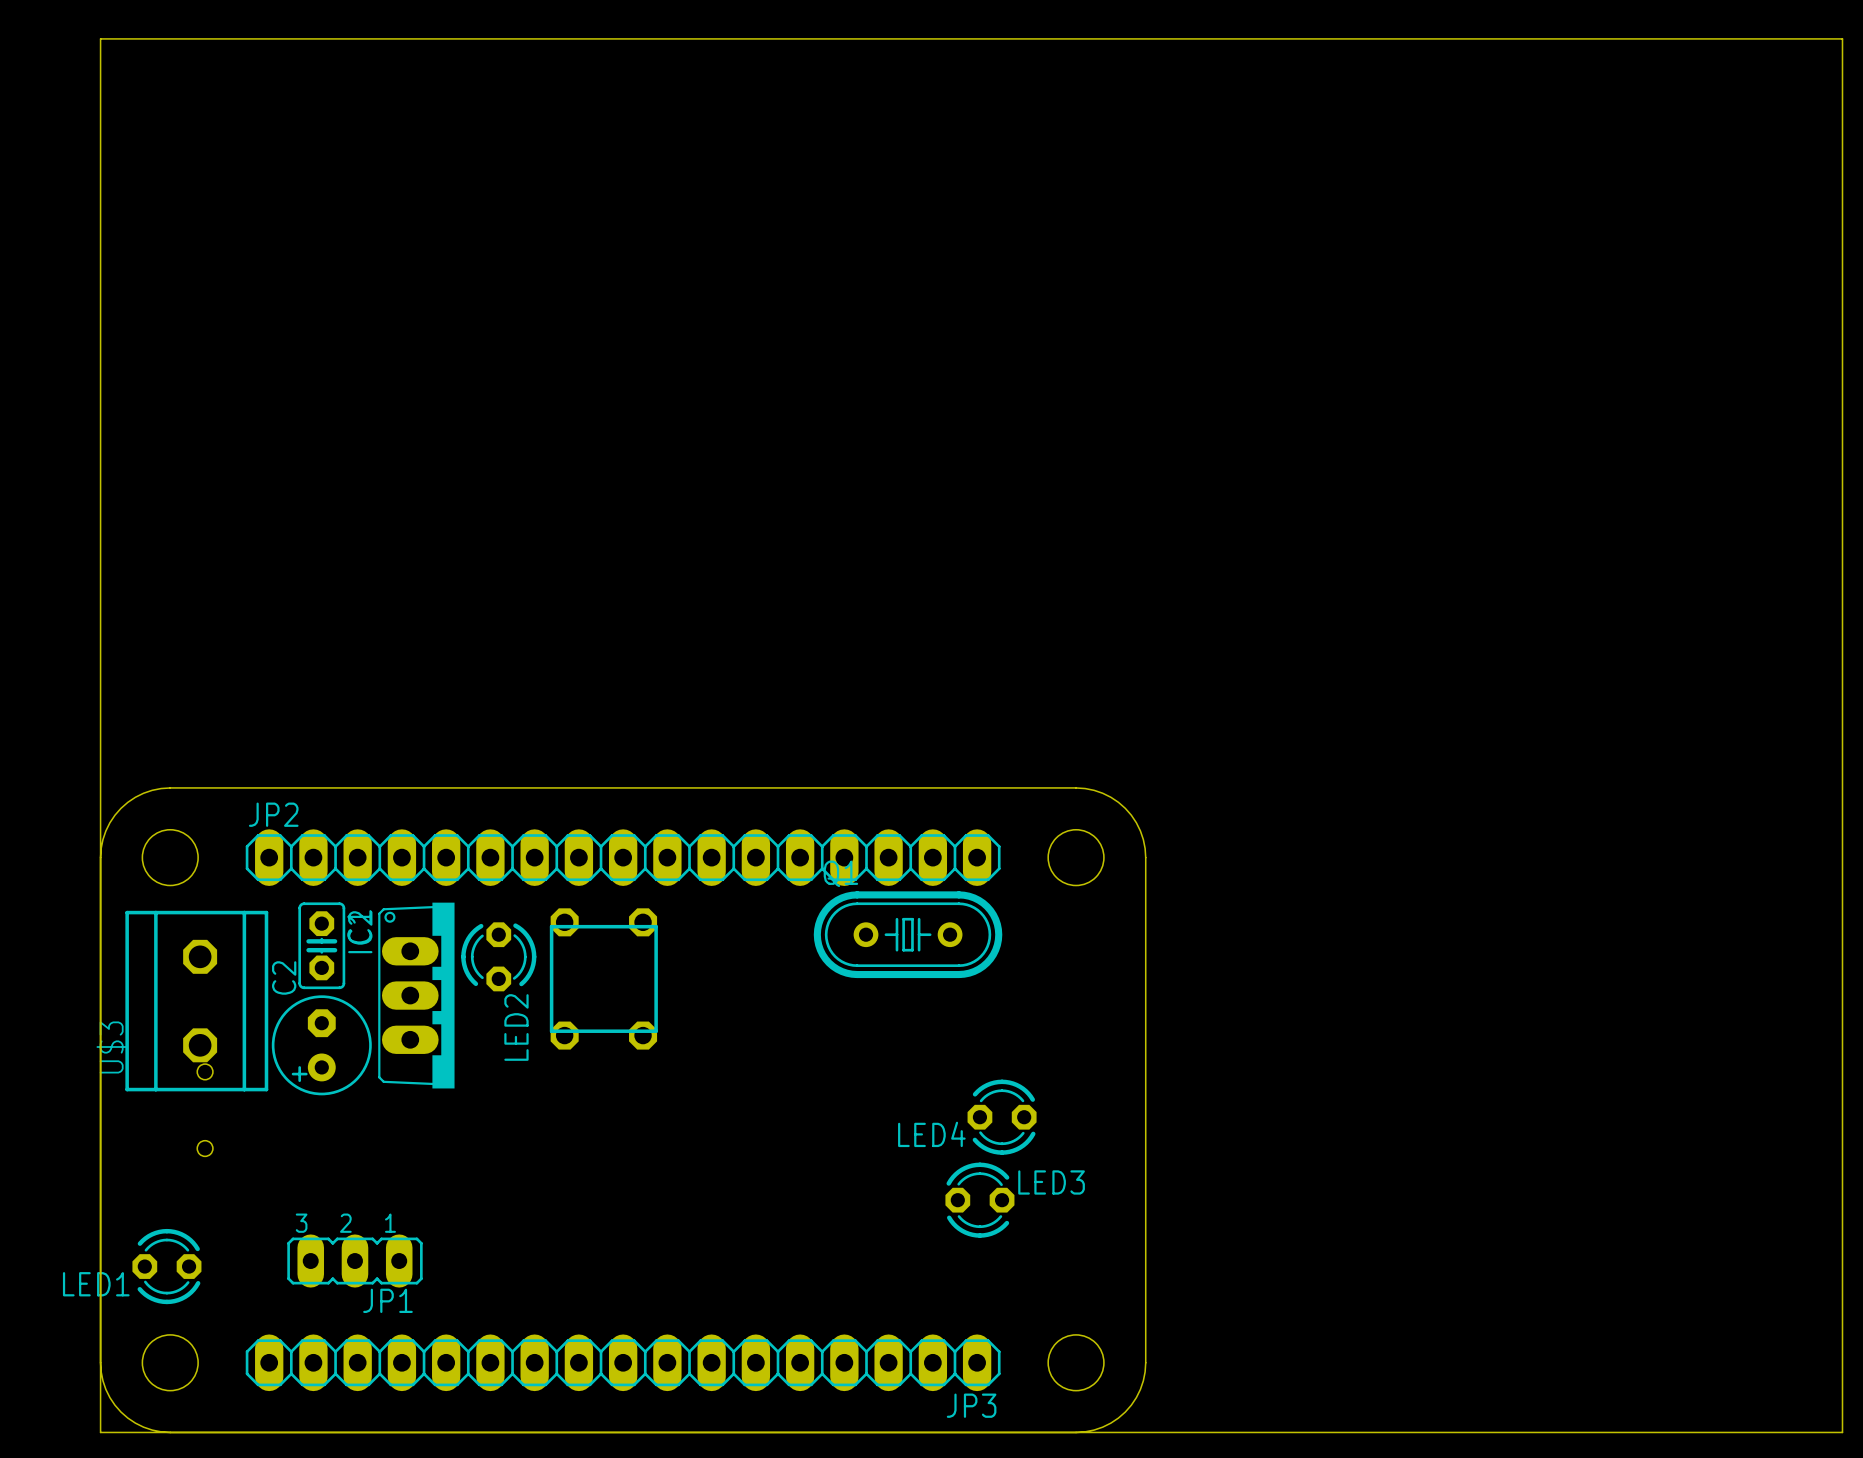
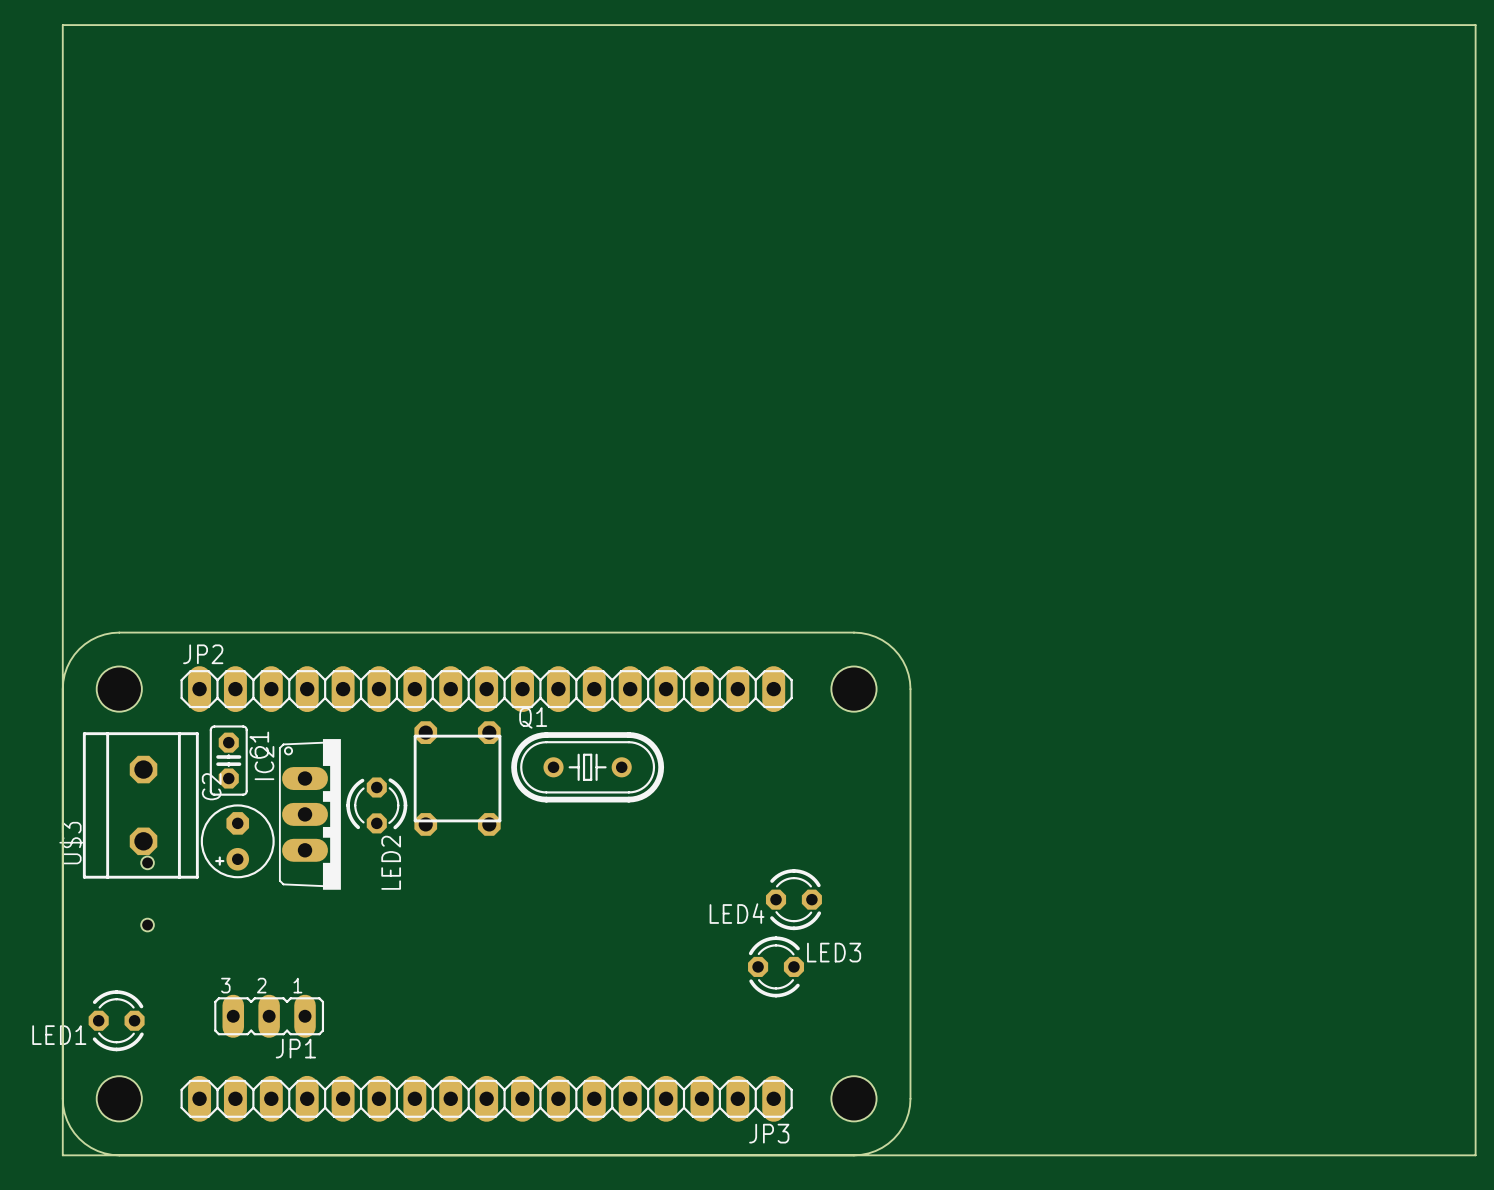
Q1 position: (908, 934) -> (587, 767)
C1 position: (321, 945) -> (228, 760)
LED2 position: (498, 956) -> (376, 805)
part position: (603, 978) -> (457, 778)
C2 footprint: [271, 995, 372, 1096] -> [200, 804, 275, 879]
IC2 position: (416, 995) -> (309, 814)

